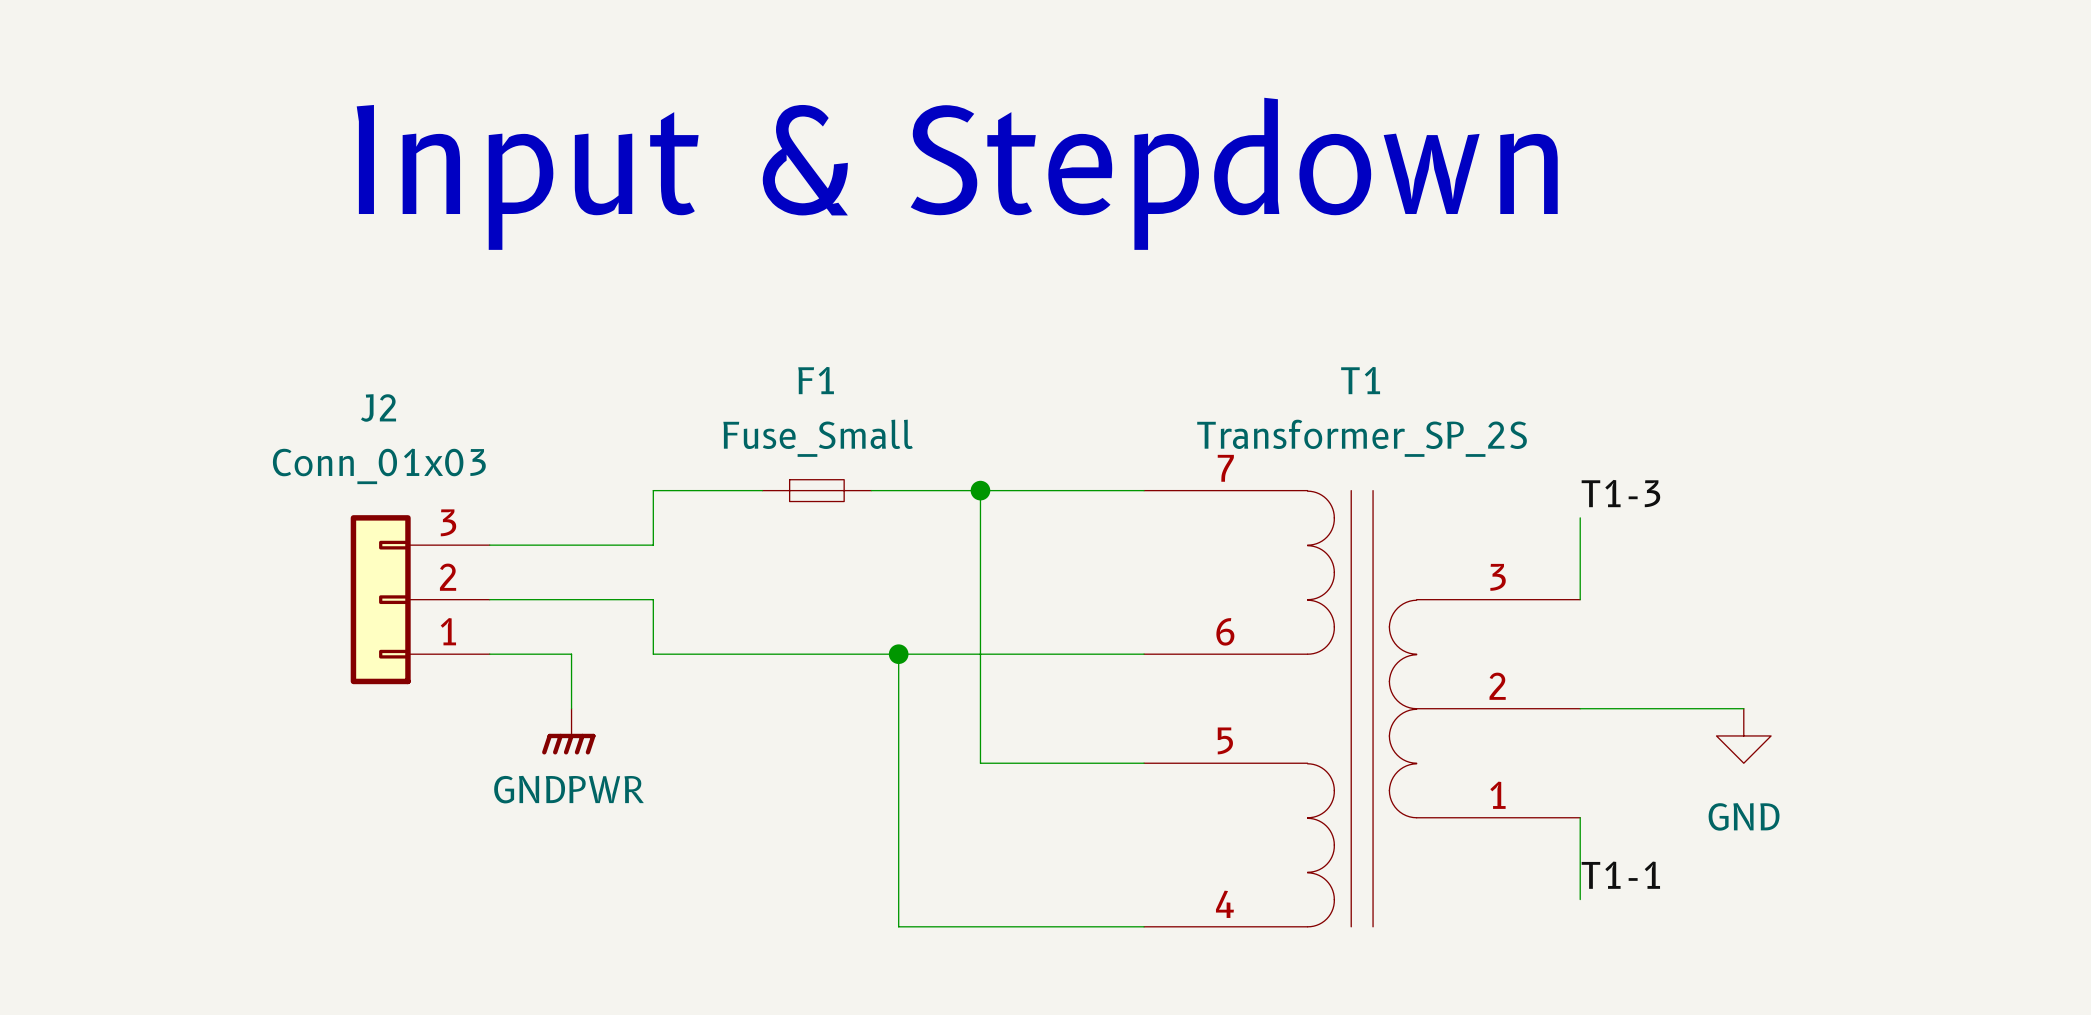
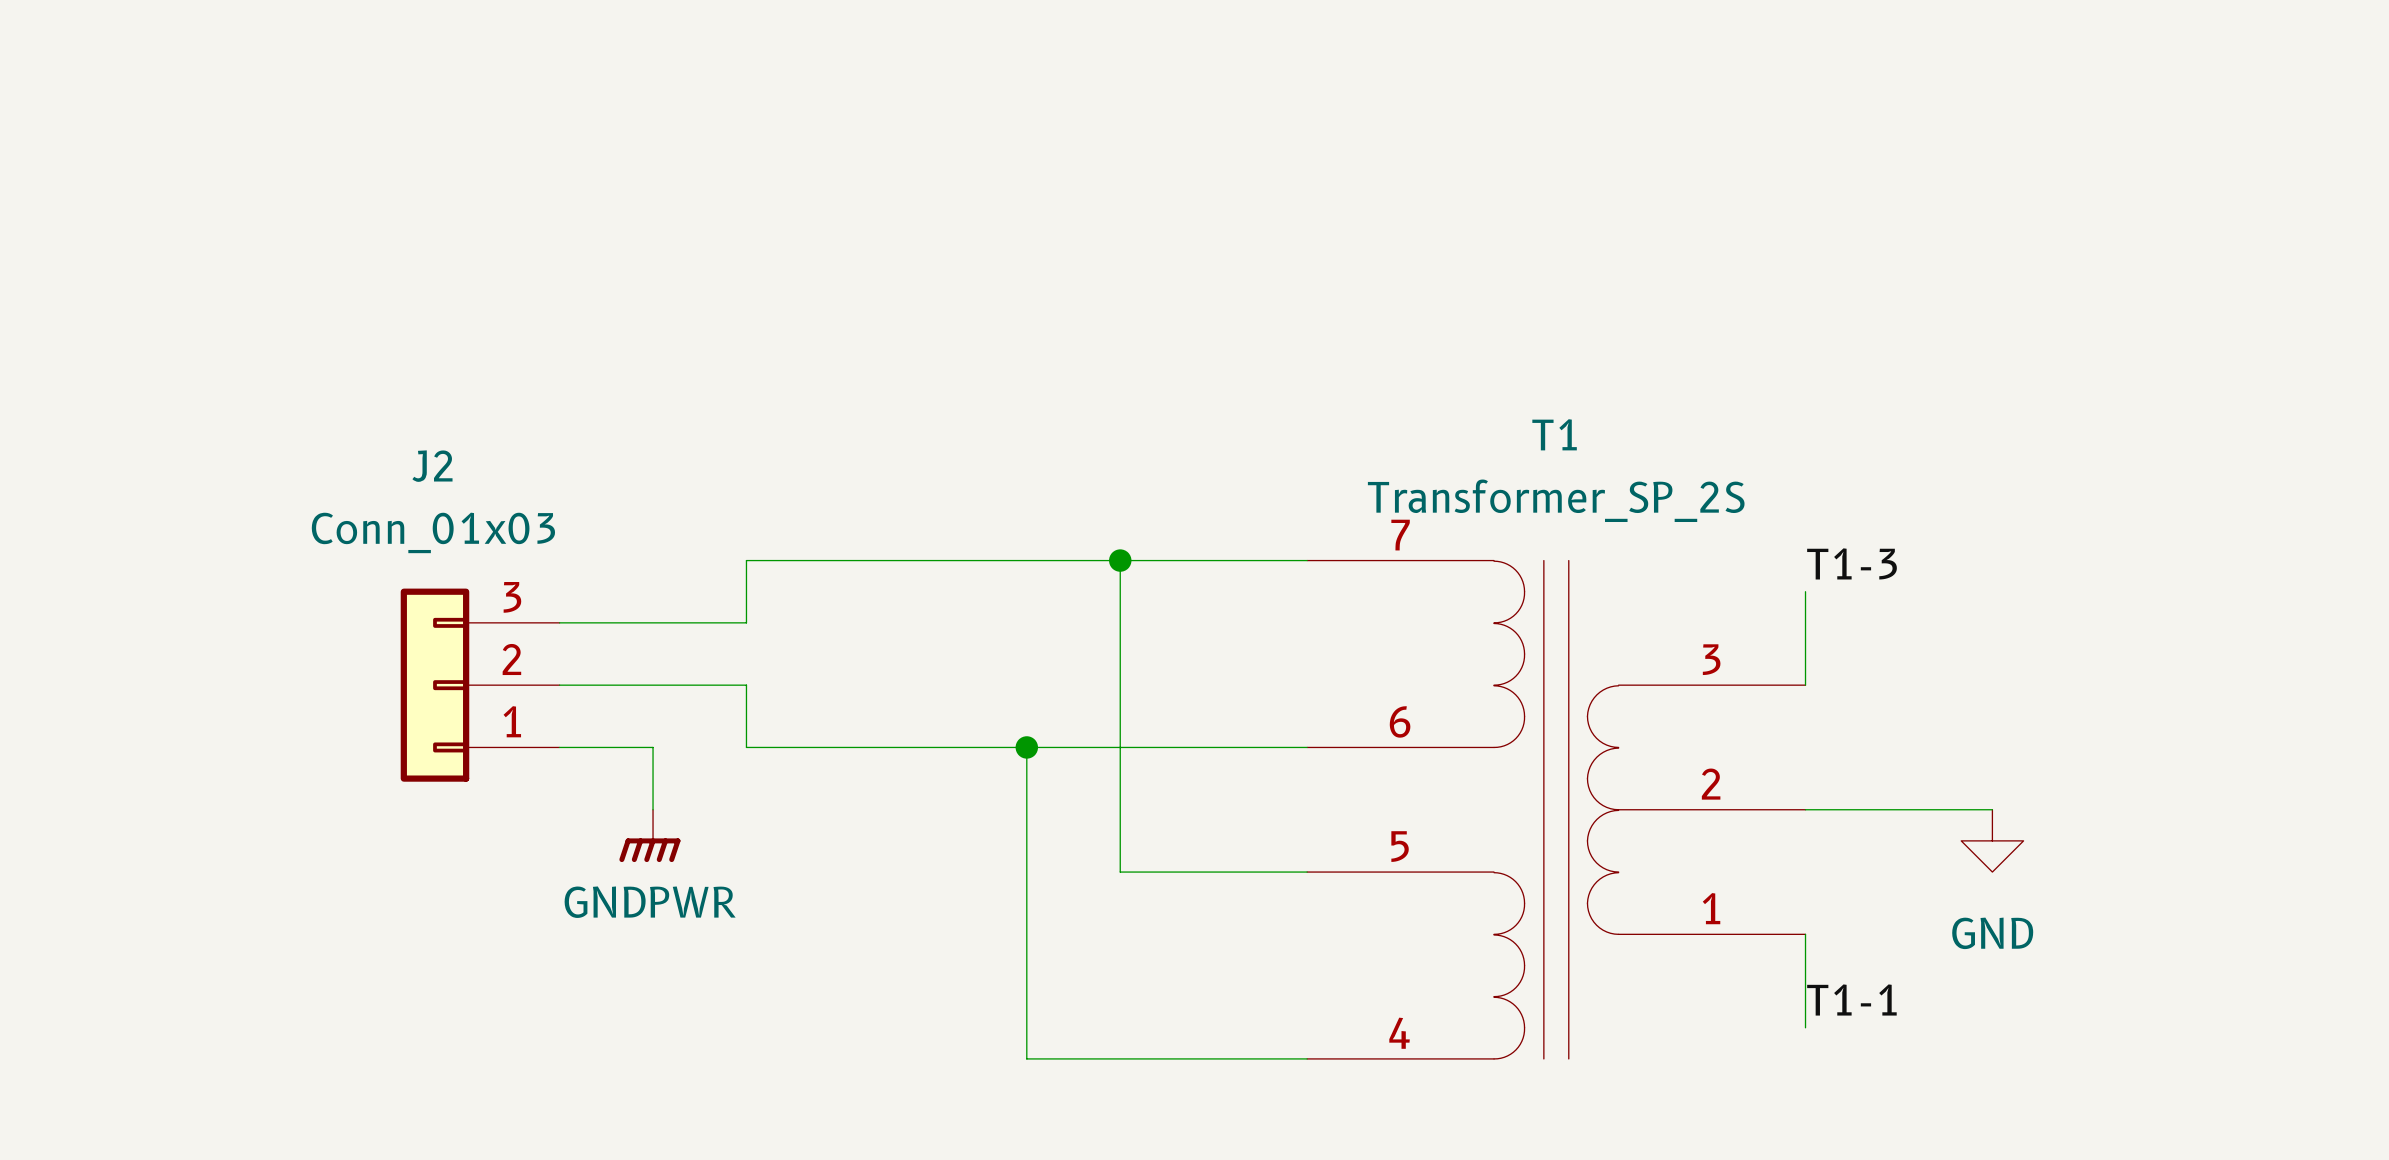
text: Input & Stepdown (957, 173) -> none
F1: Fuse_Small (816, 490) -> none

